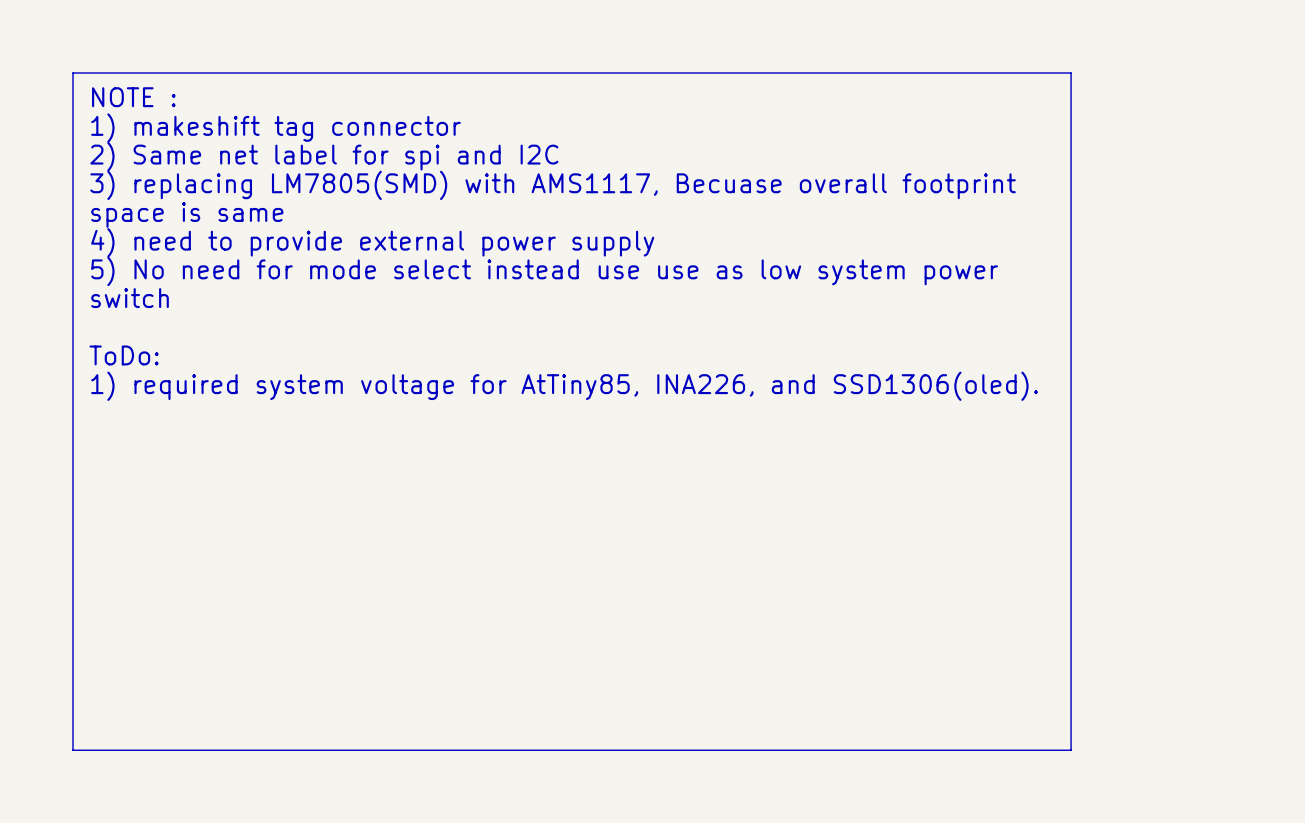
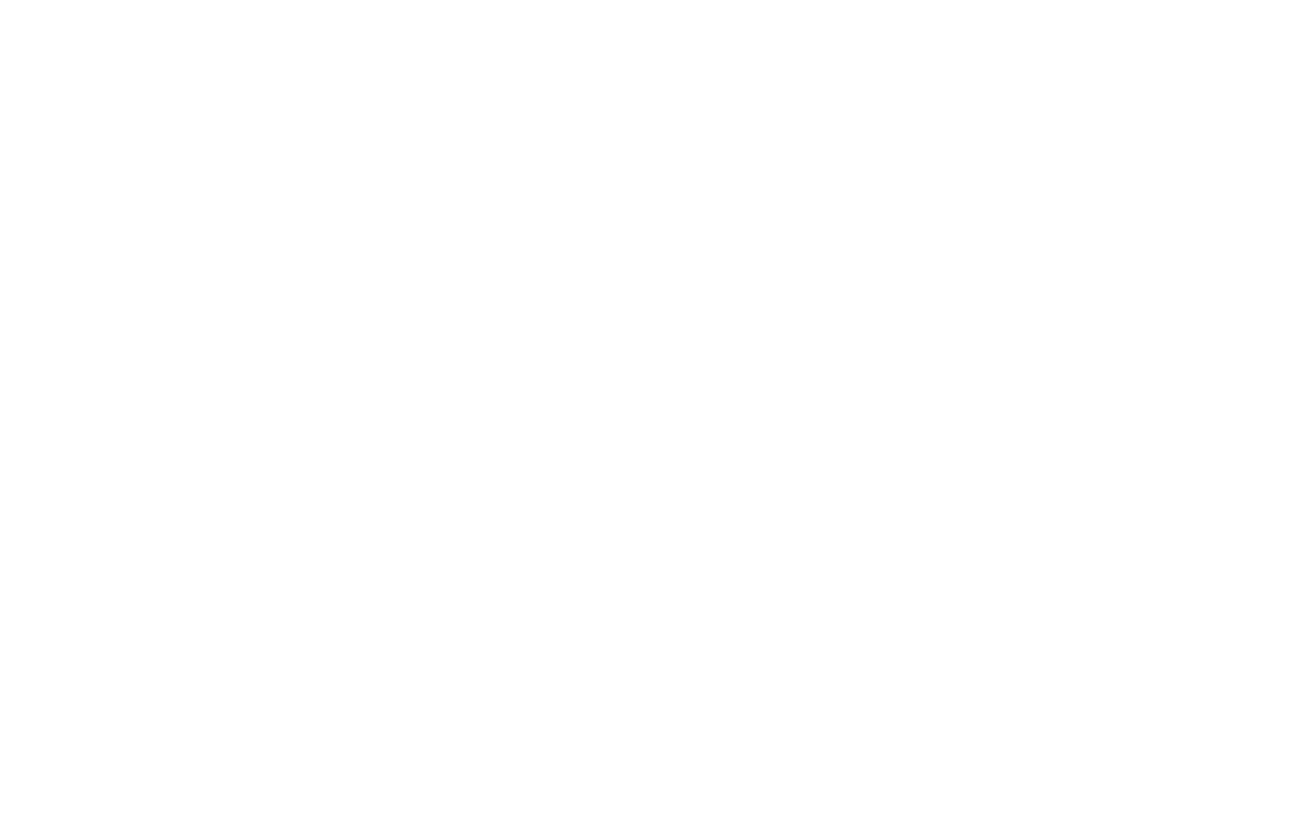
line: (73, 73) (1071, 73) (1071, 750) (73, 750) (73, 73) -> none
text: NOTE : (133, 97) -> none
text: 1) makeshift tag connector (275, 128) -> none
text: 2) Same net label for spi and I2C (324, 156) -> none
text: 3) replacing LM7805(SMD) with AMS1117, Becuase overall footprint (553, 185) -> none
text: space is same (187, 214) -> none
text: 4) need to provide external power supply (372, 242) -> none
text: 5) No need for mode select instead use use as low system power (544, 271) -> none
text: switch (130, 298) -> none
text: ToDo: (124, 355) -> none
text: 1) required system voltage for AtTiny85, INA226, and SSD1306(oled). (564, 386) -> none

